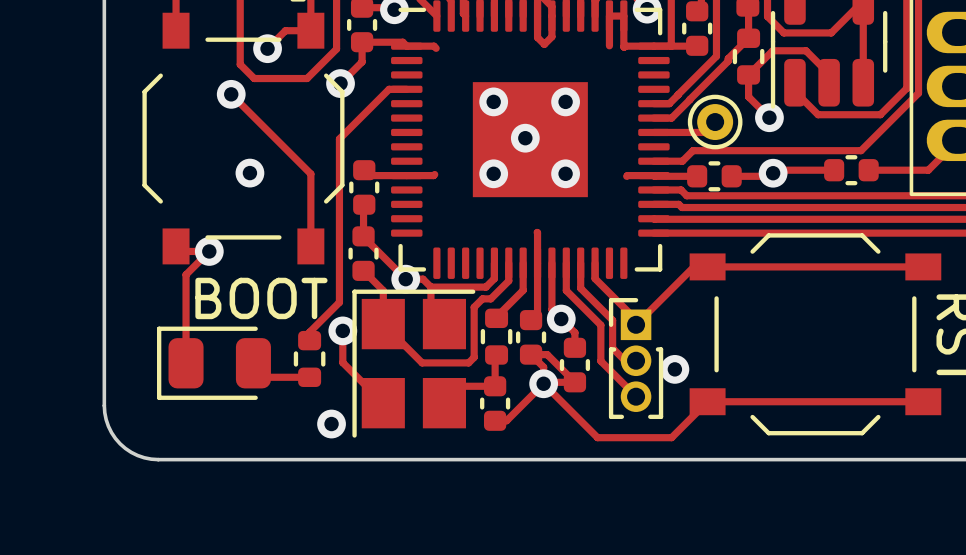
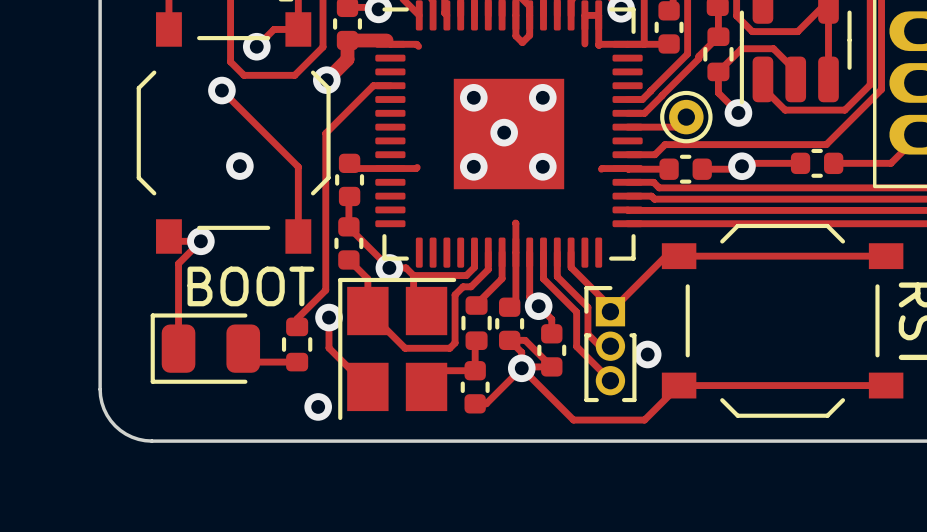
track width: thin (402, 42) (362, 42) (362, 61) (340, 83) -> thick (386, 40) (347, 40) (347, 59) (326, 80)

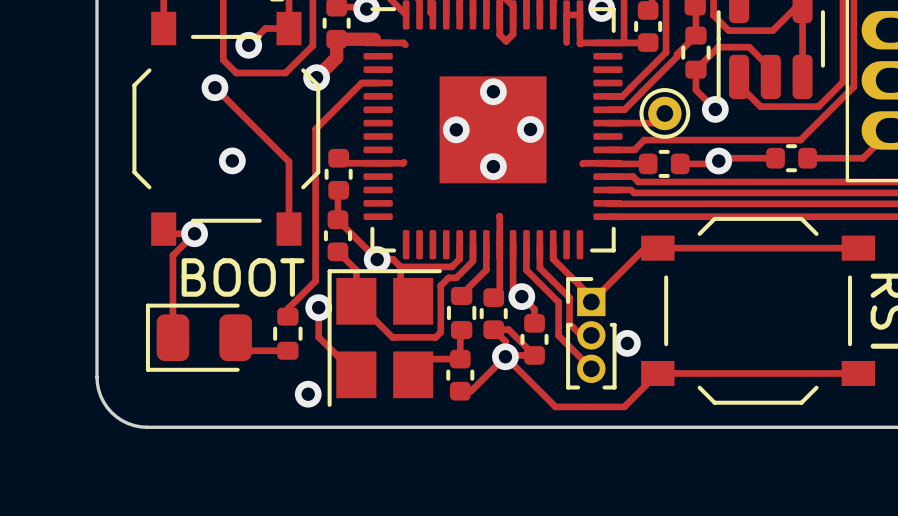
via: none -> (493, 91)
via: (473, 97) -> none
via: (542, 97) -> none
via: (504, 132) -> none
via: none -> (530, 129)
via: none -> (456, 129)
via: (473, 166) -> none
via: (542, 166) -> none
via: none -> (493, 166)

